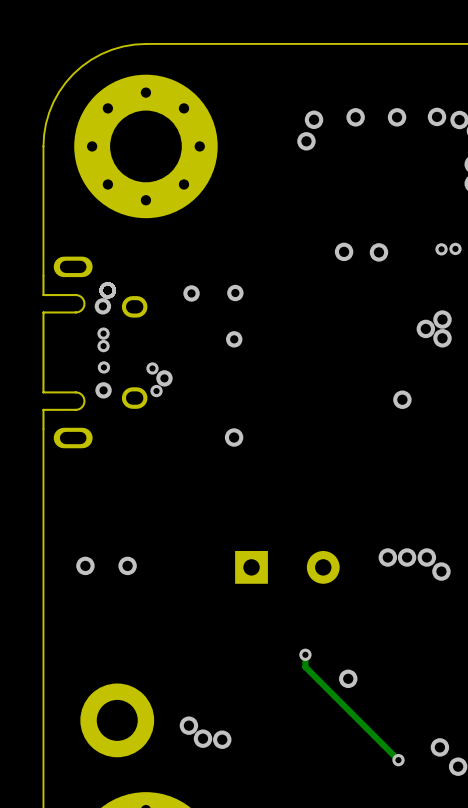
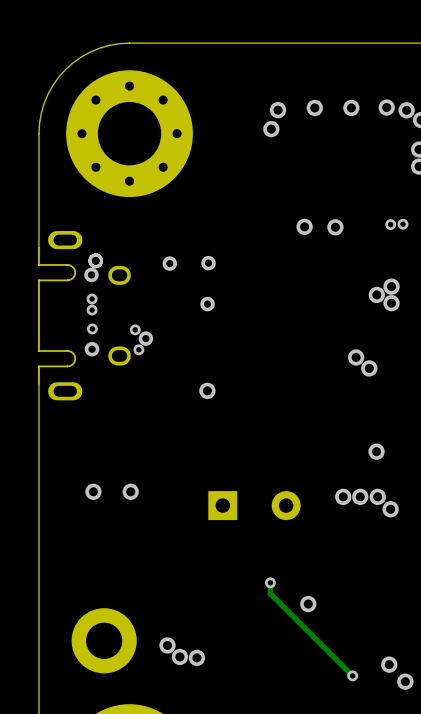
via: none -> (369, 368)
via: none -> (376, 451)
via: none -> (93, 491)
via: none -> (130, 491)
via: (85, 565) -> none
via: (127, 565) -> none

